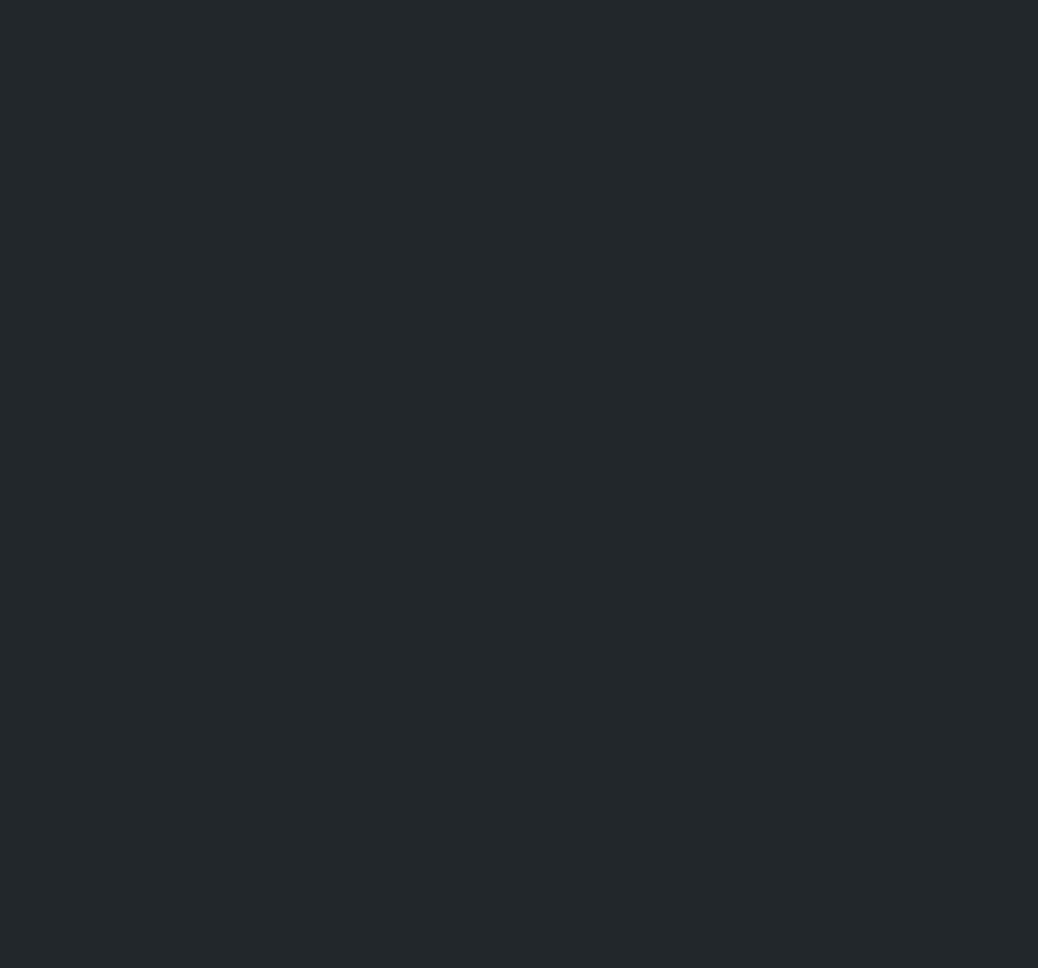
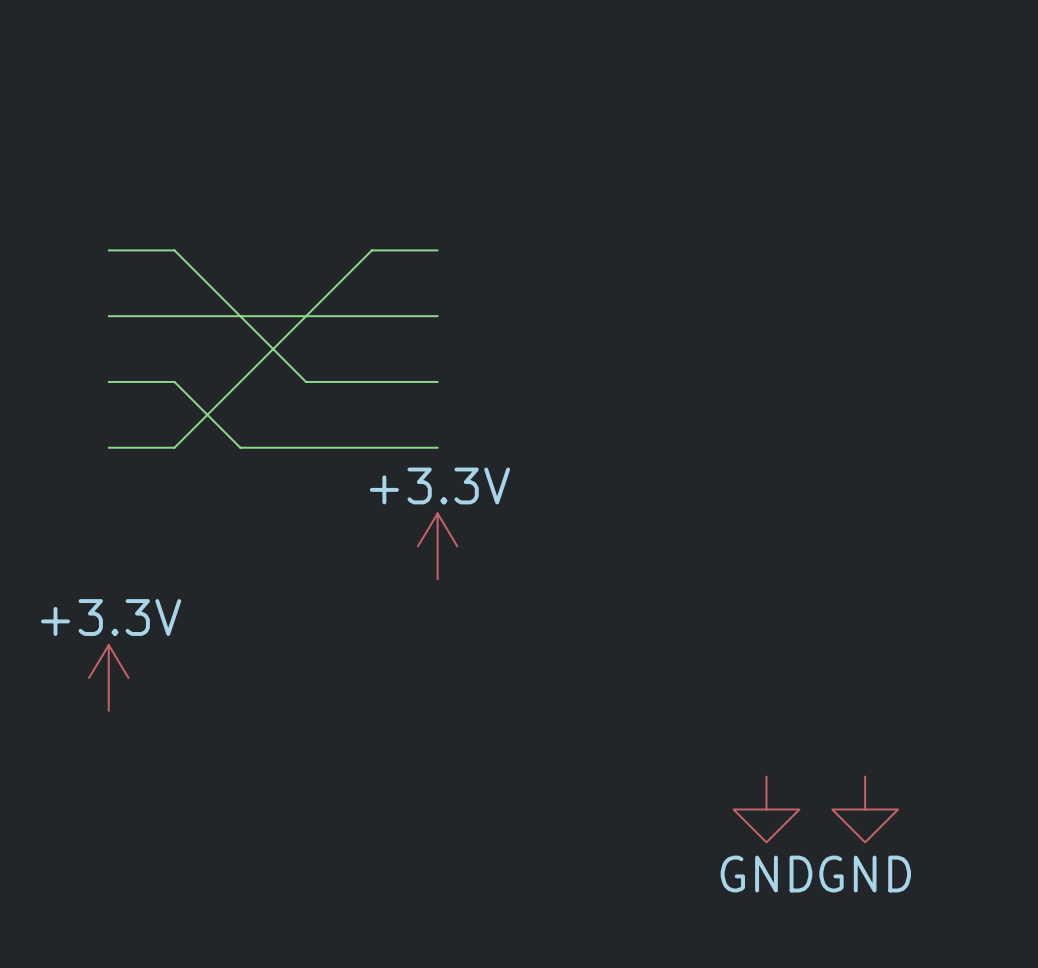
wire: none -> (108, 250) (174, 250) (306, 381) (437, 381)
wire: none -> (437, 250) (371, 250) (174, 447) (108, 447)
wire: none -> (108, 316) (437, 316)
wire: none -> (108, 381) (174, 381) (240, 447) (437, 447)
power symbol: none -> +3.3V (437, 546)
power symbol: none -> +3.3V (108, 677)
power symbol: none -> GND (766, 809)
power symbol: none -> GND (865, 809)

